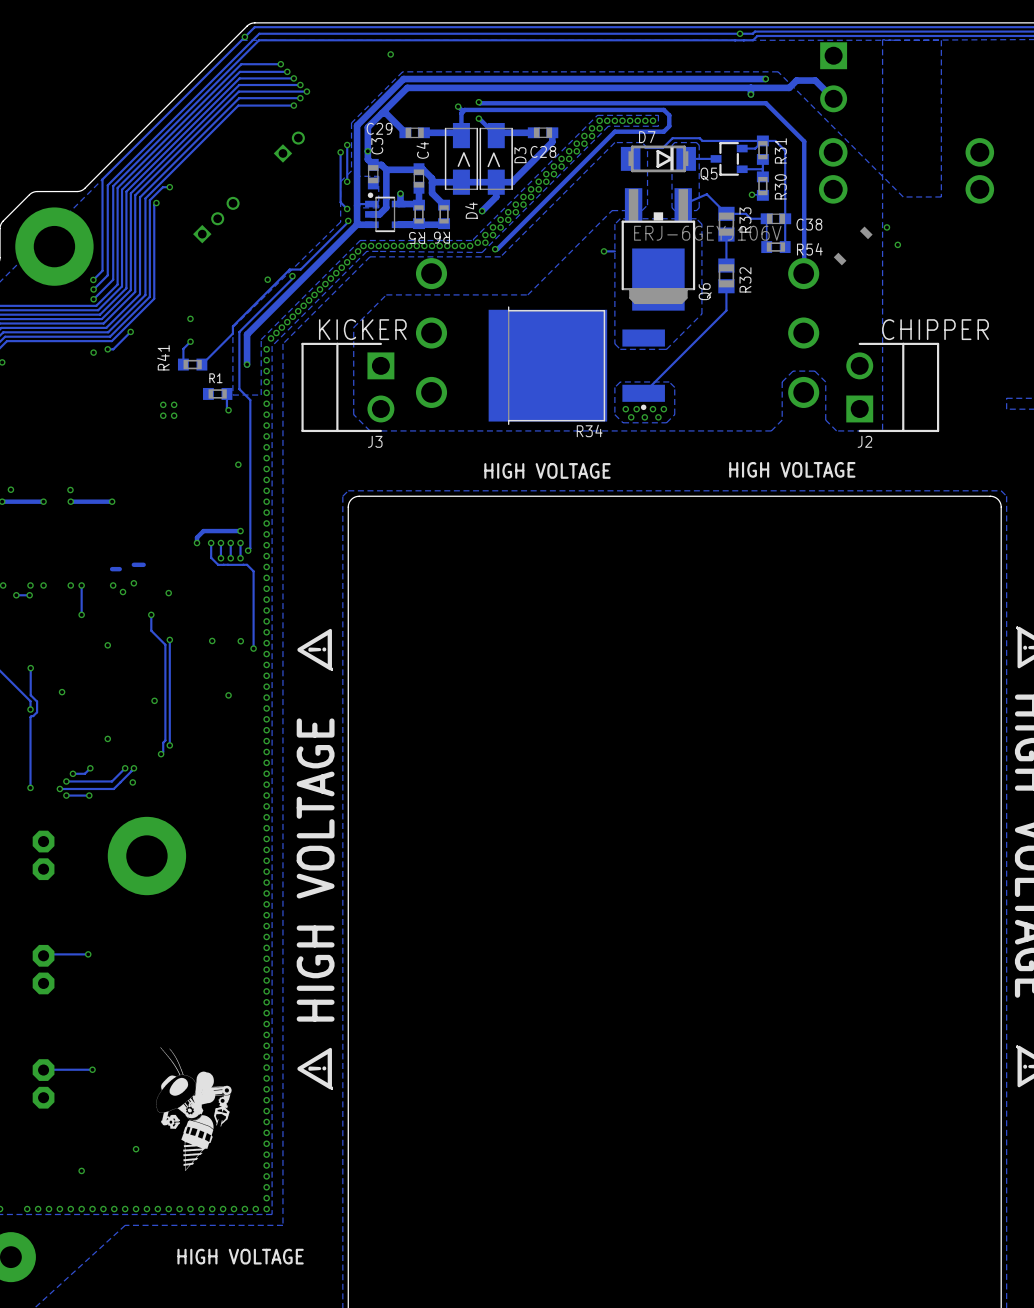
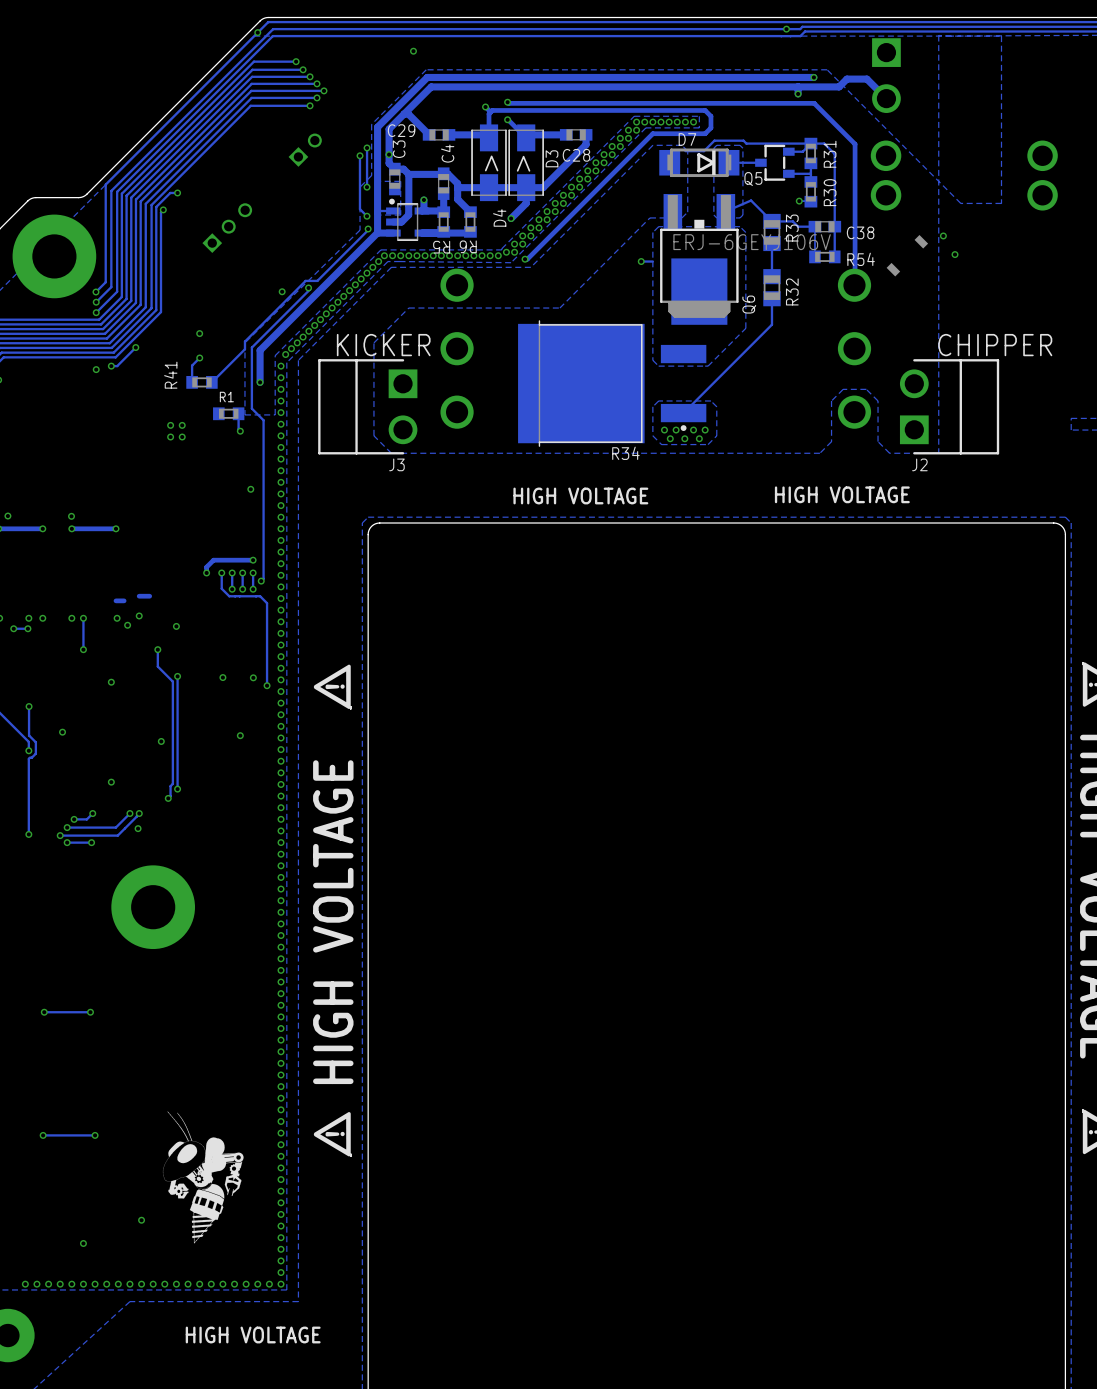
part: (43, 855) -> none
via: none -> (44, 1012)
part: (43, 969) -> none
via: none -> (43, 1135)
part: (43, 1083) -> none

